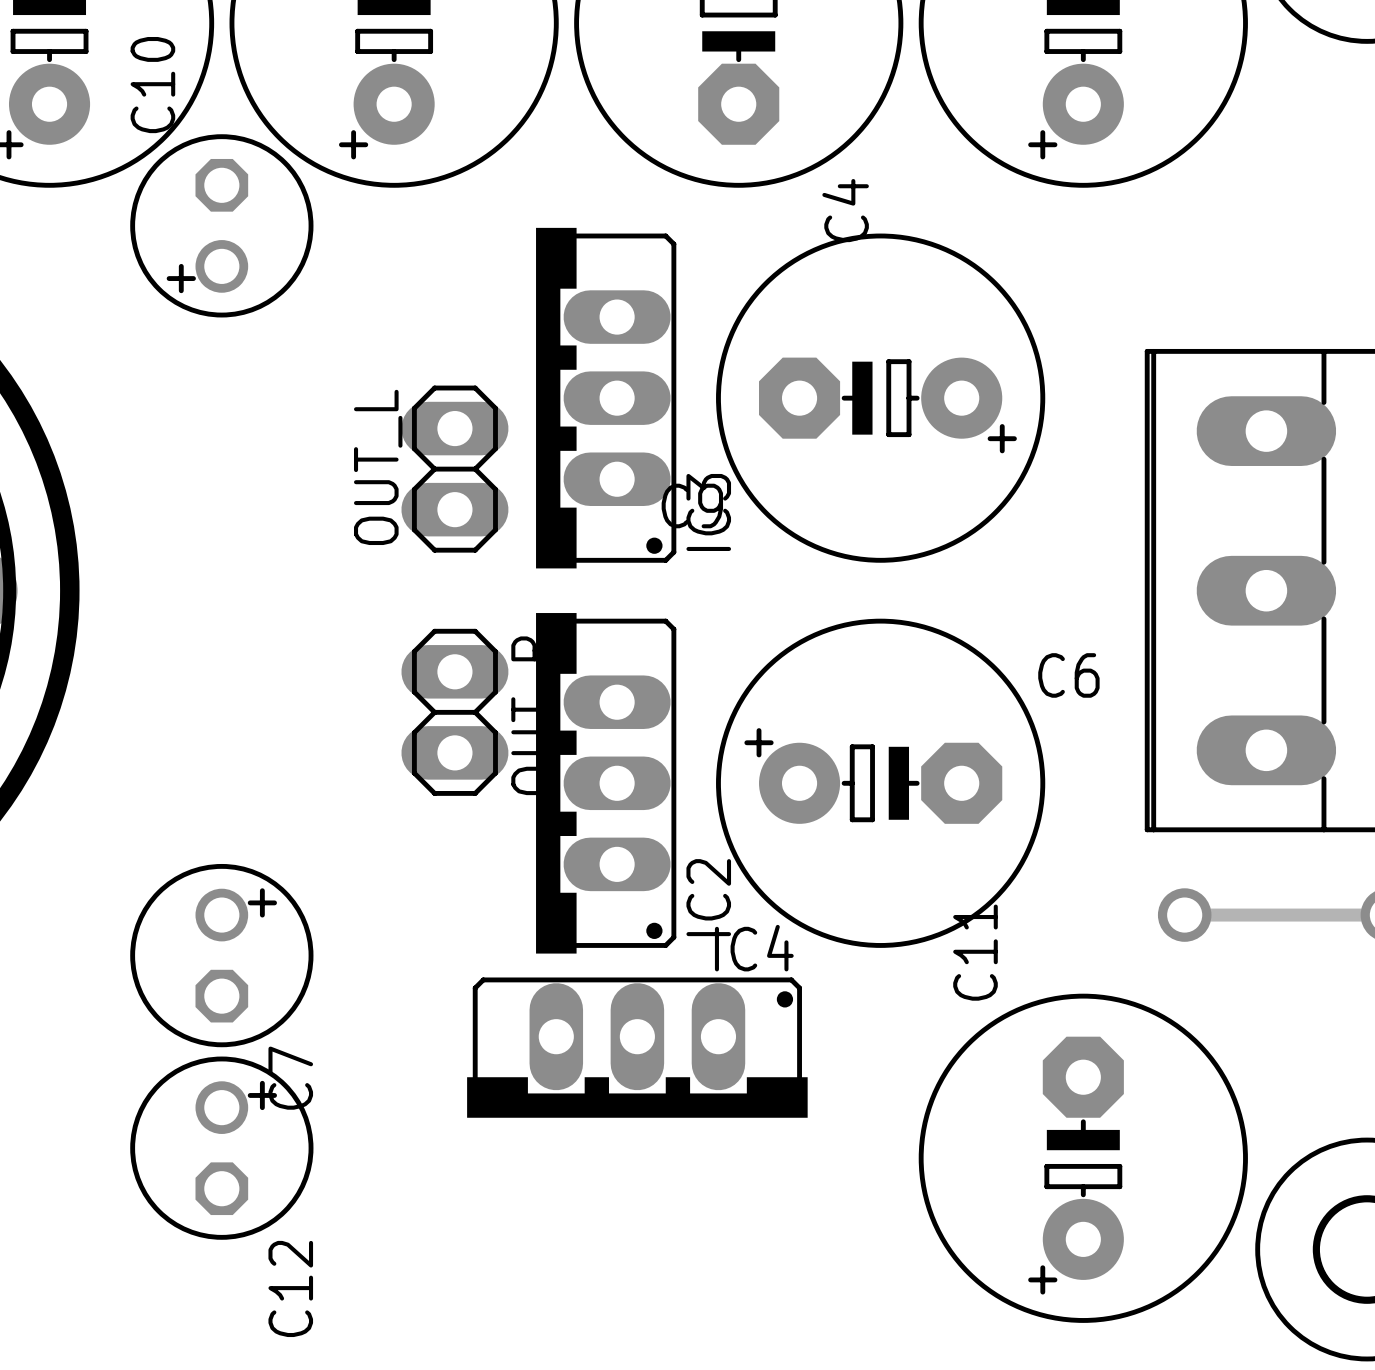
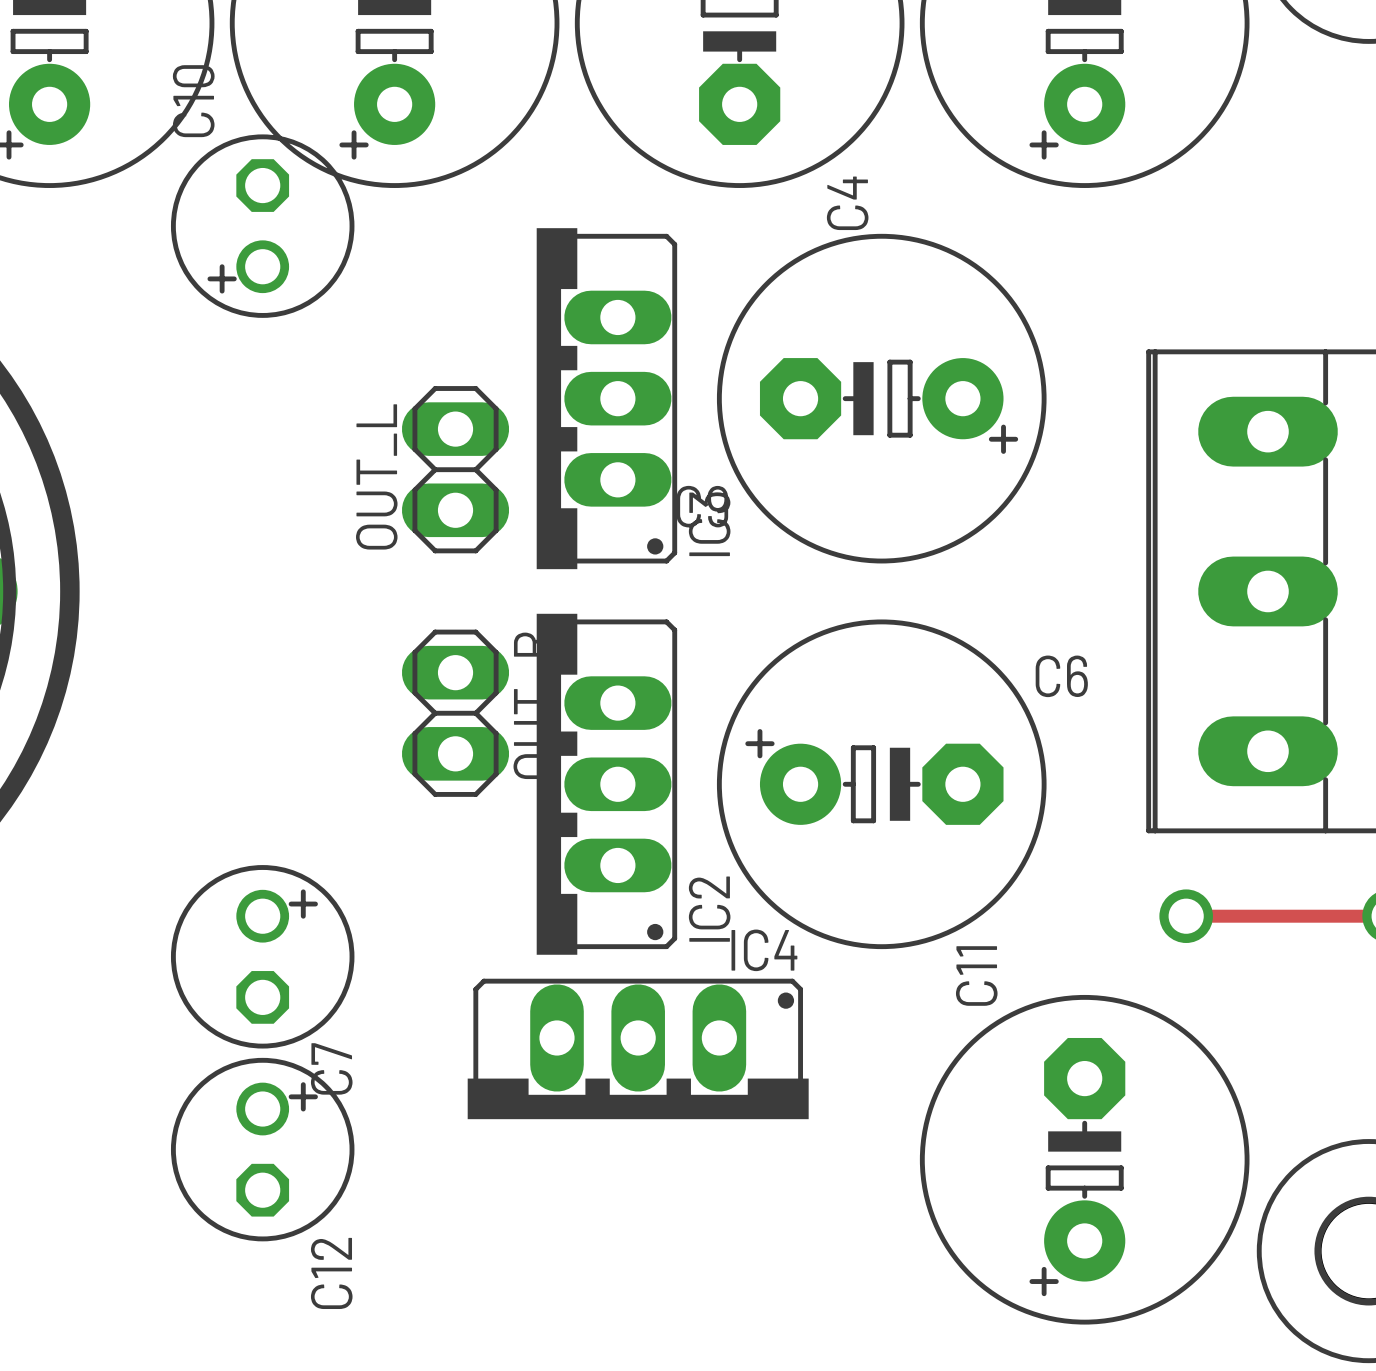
C10 position: (221, 225) -> (262, 226)
C7 position: (221, 955) -> (262, 956)
C12 position: (221, 1148) -> (262, 1149)

